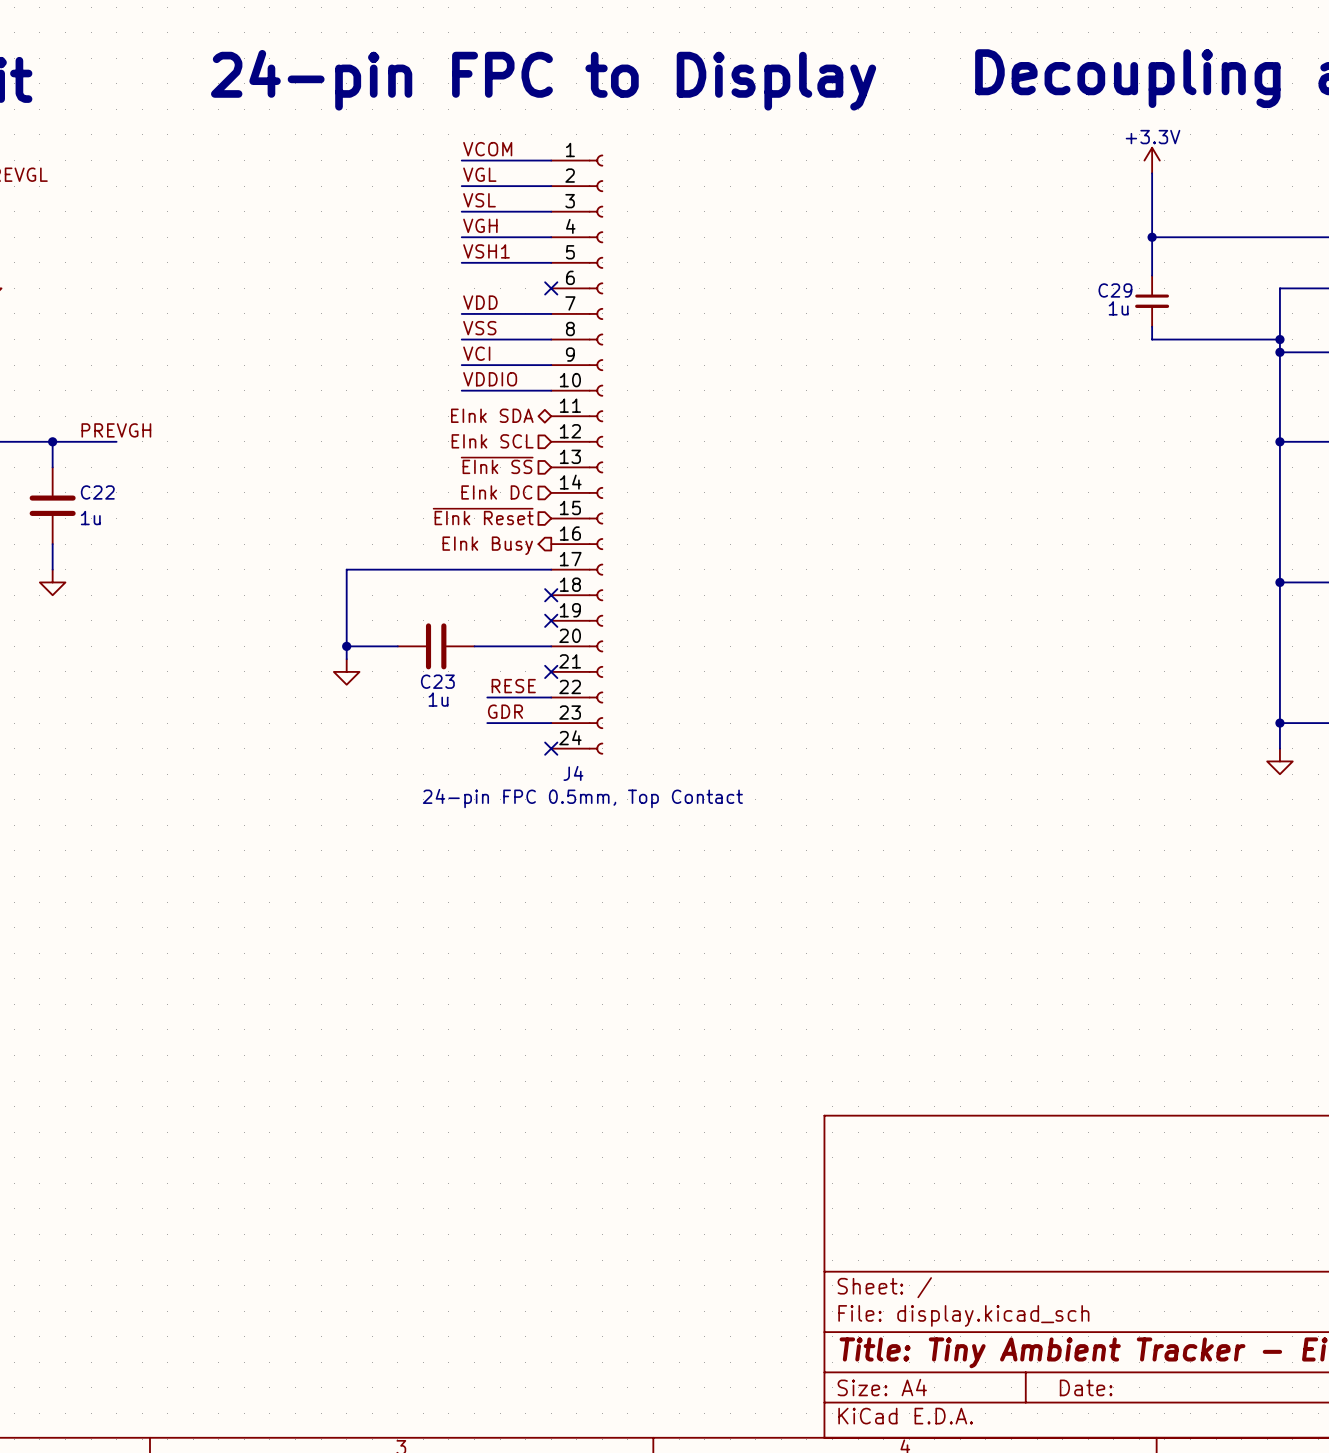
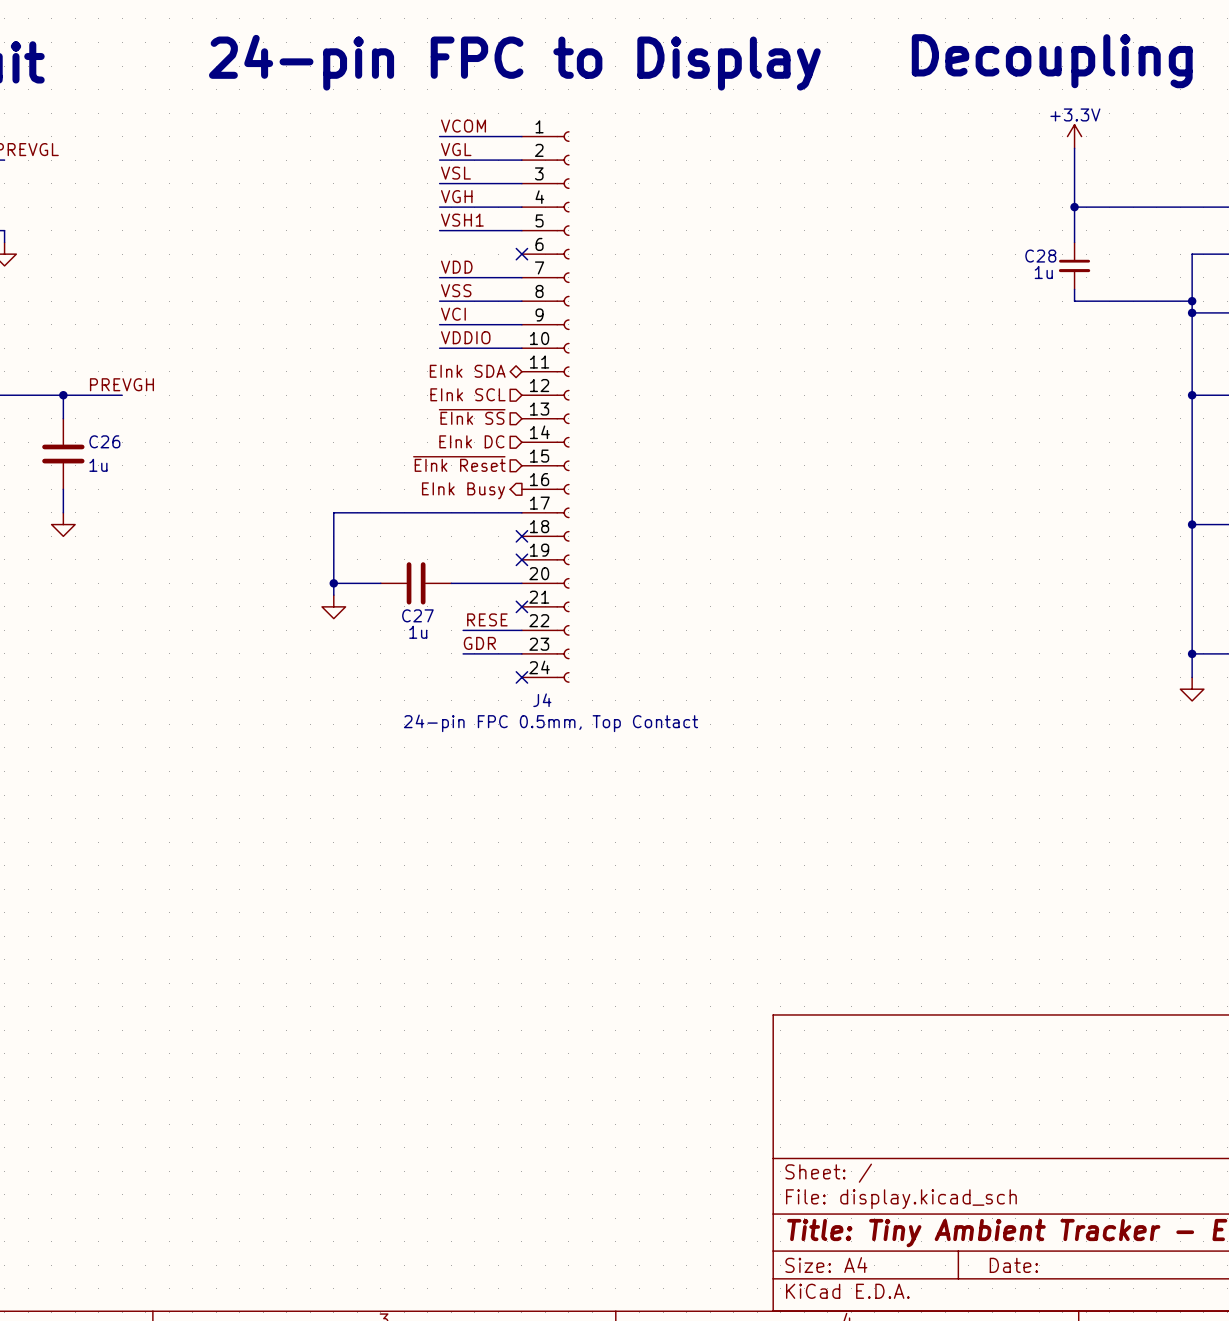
C29 name: C29 (1115, 290) -> C28 (1040, 256)
C22 name: C22 (97, 492) -> C26 (104, 441)
C23 name: C23 (437, 681) -> C27 (417, 615)

